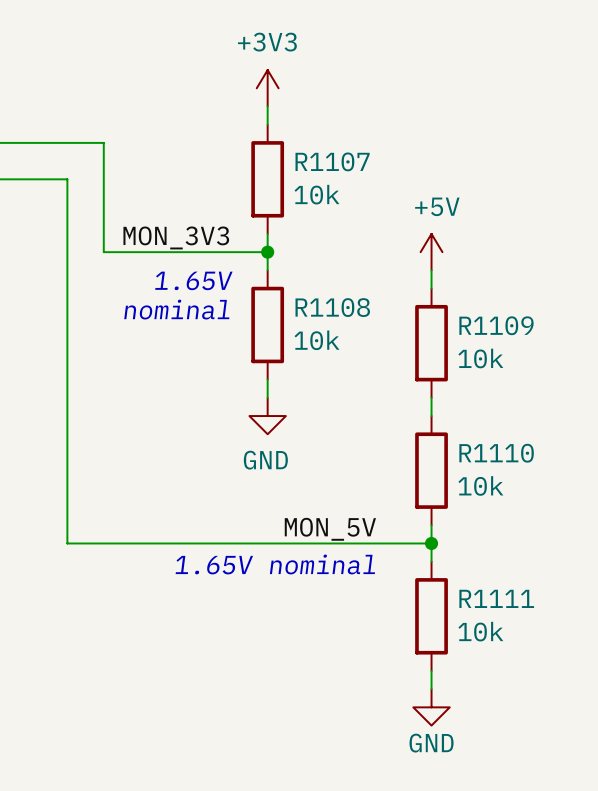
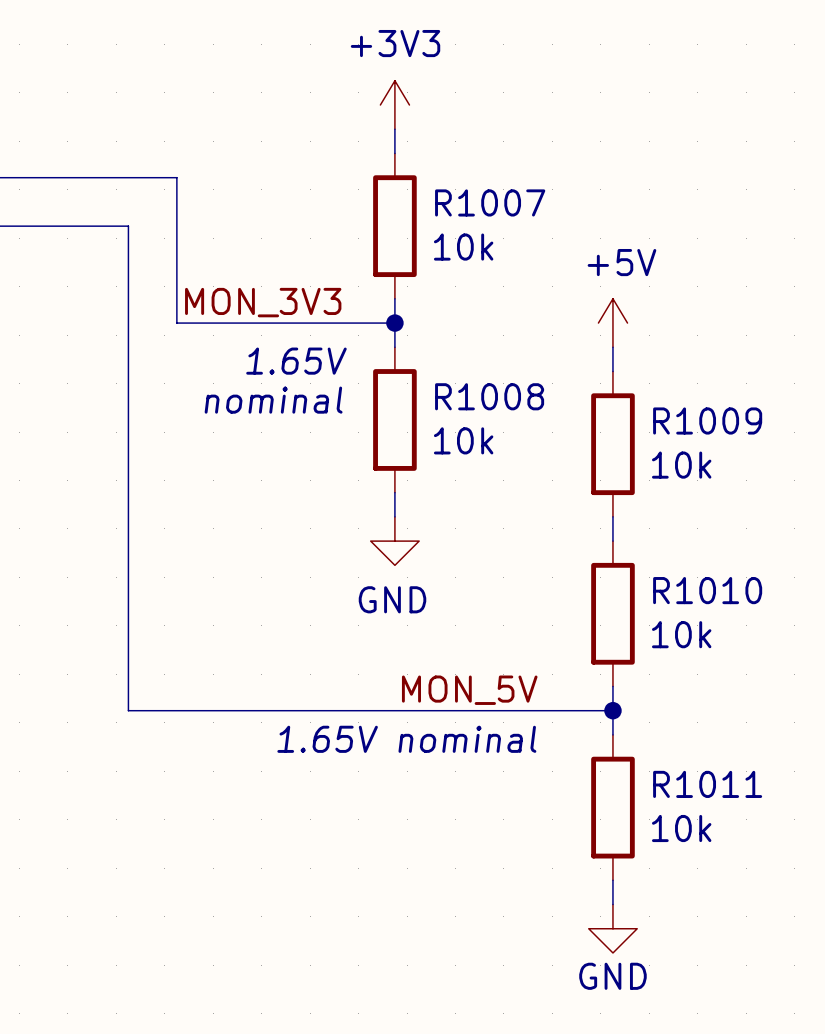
R1107 name: R1107 (332, 161) -> R1007 (490, 202)
R1108 name: R1108 (332, 307) -> R1008 (489, 396)
R1109 name: R1109 (496, 325) -> R1009 (707, 421)
R1110 name: R1110 (496, 453) -> R1010 (707, 590)
R1111 name: R1111 (496, 598) -> R1011 (707, 784)

